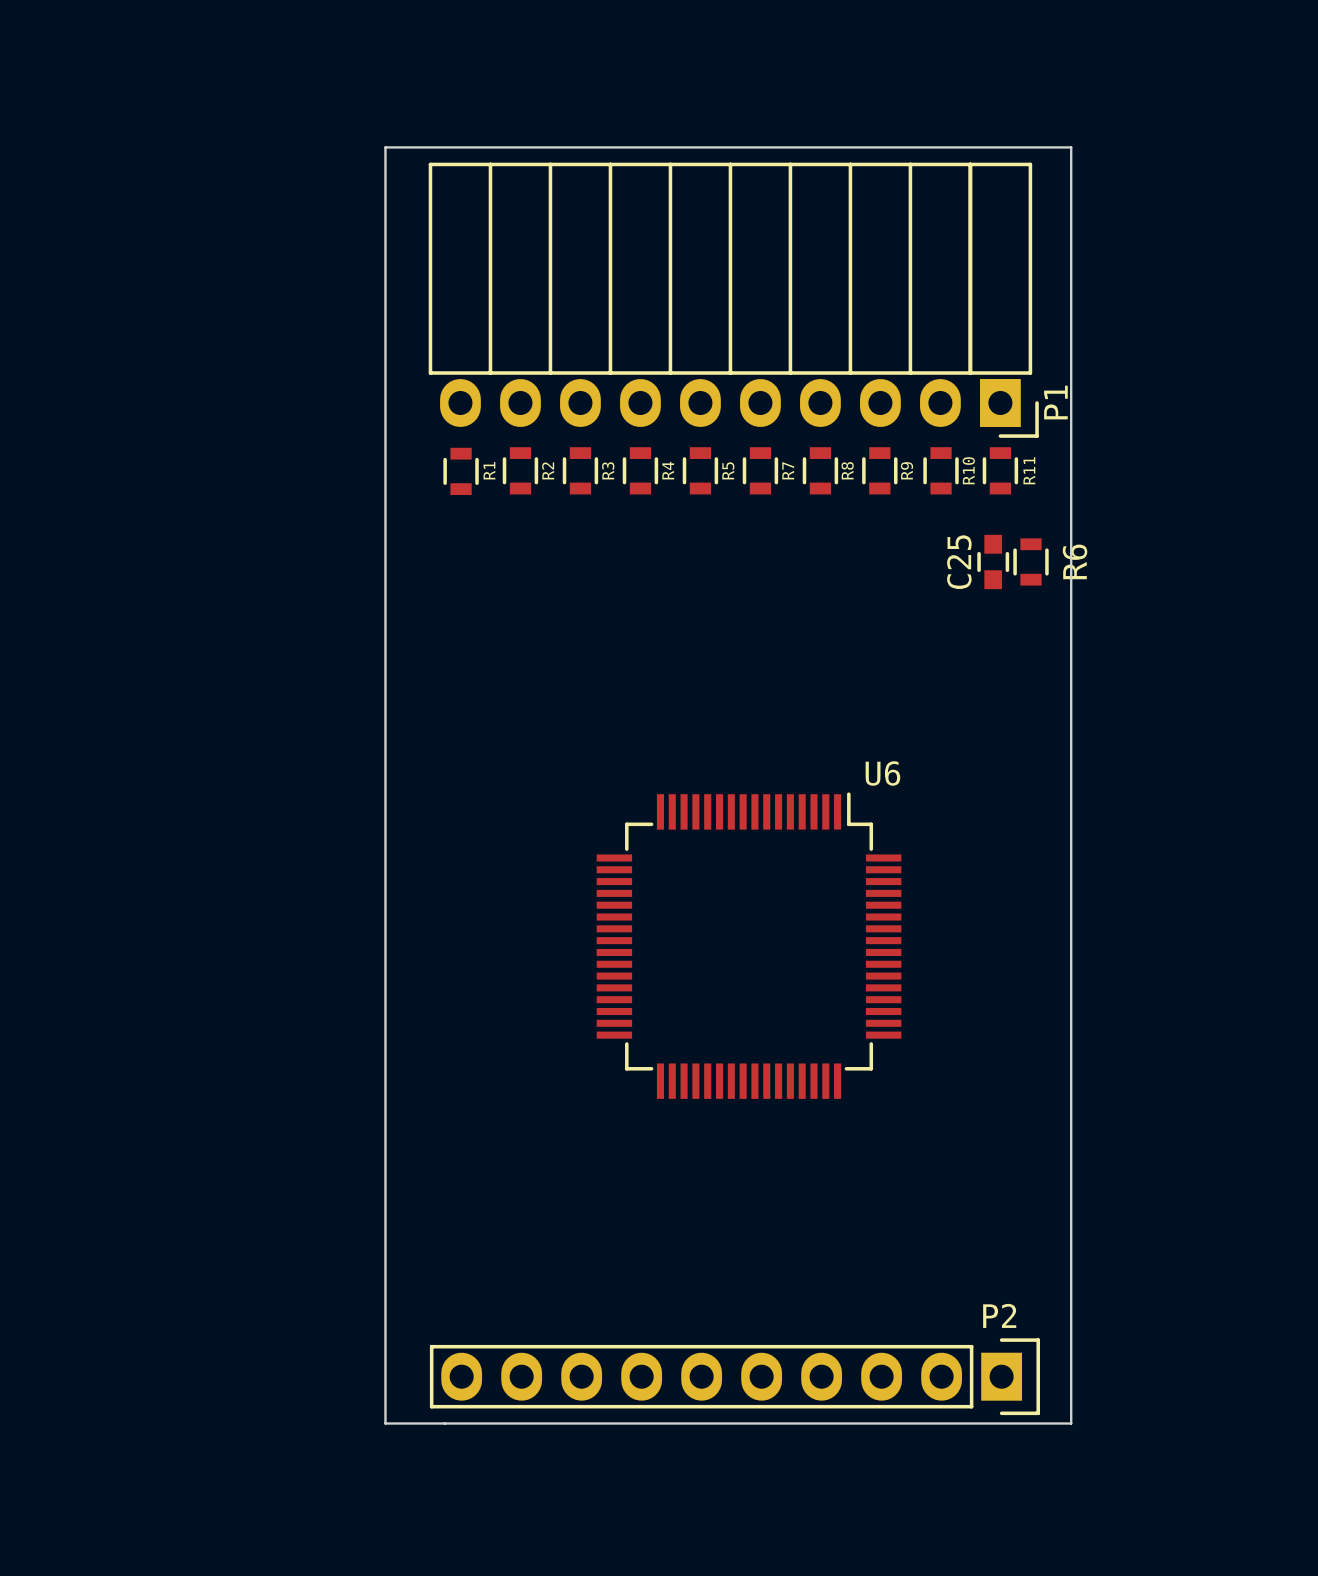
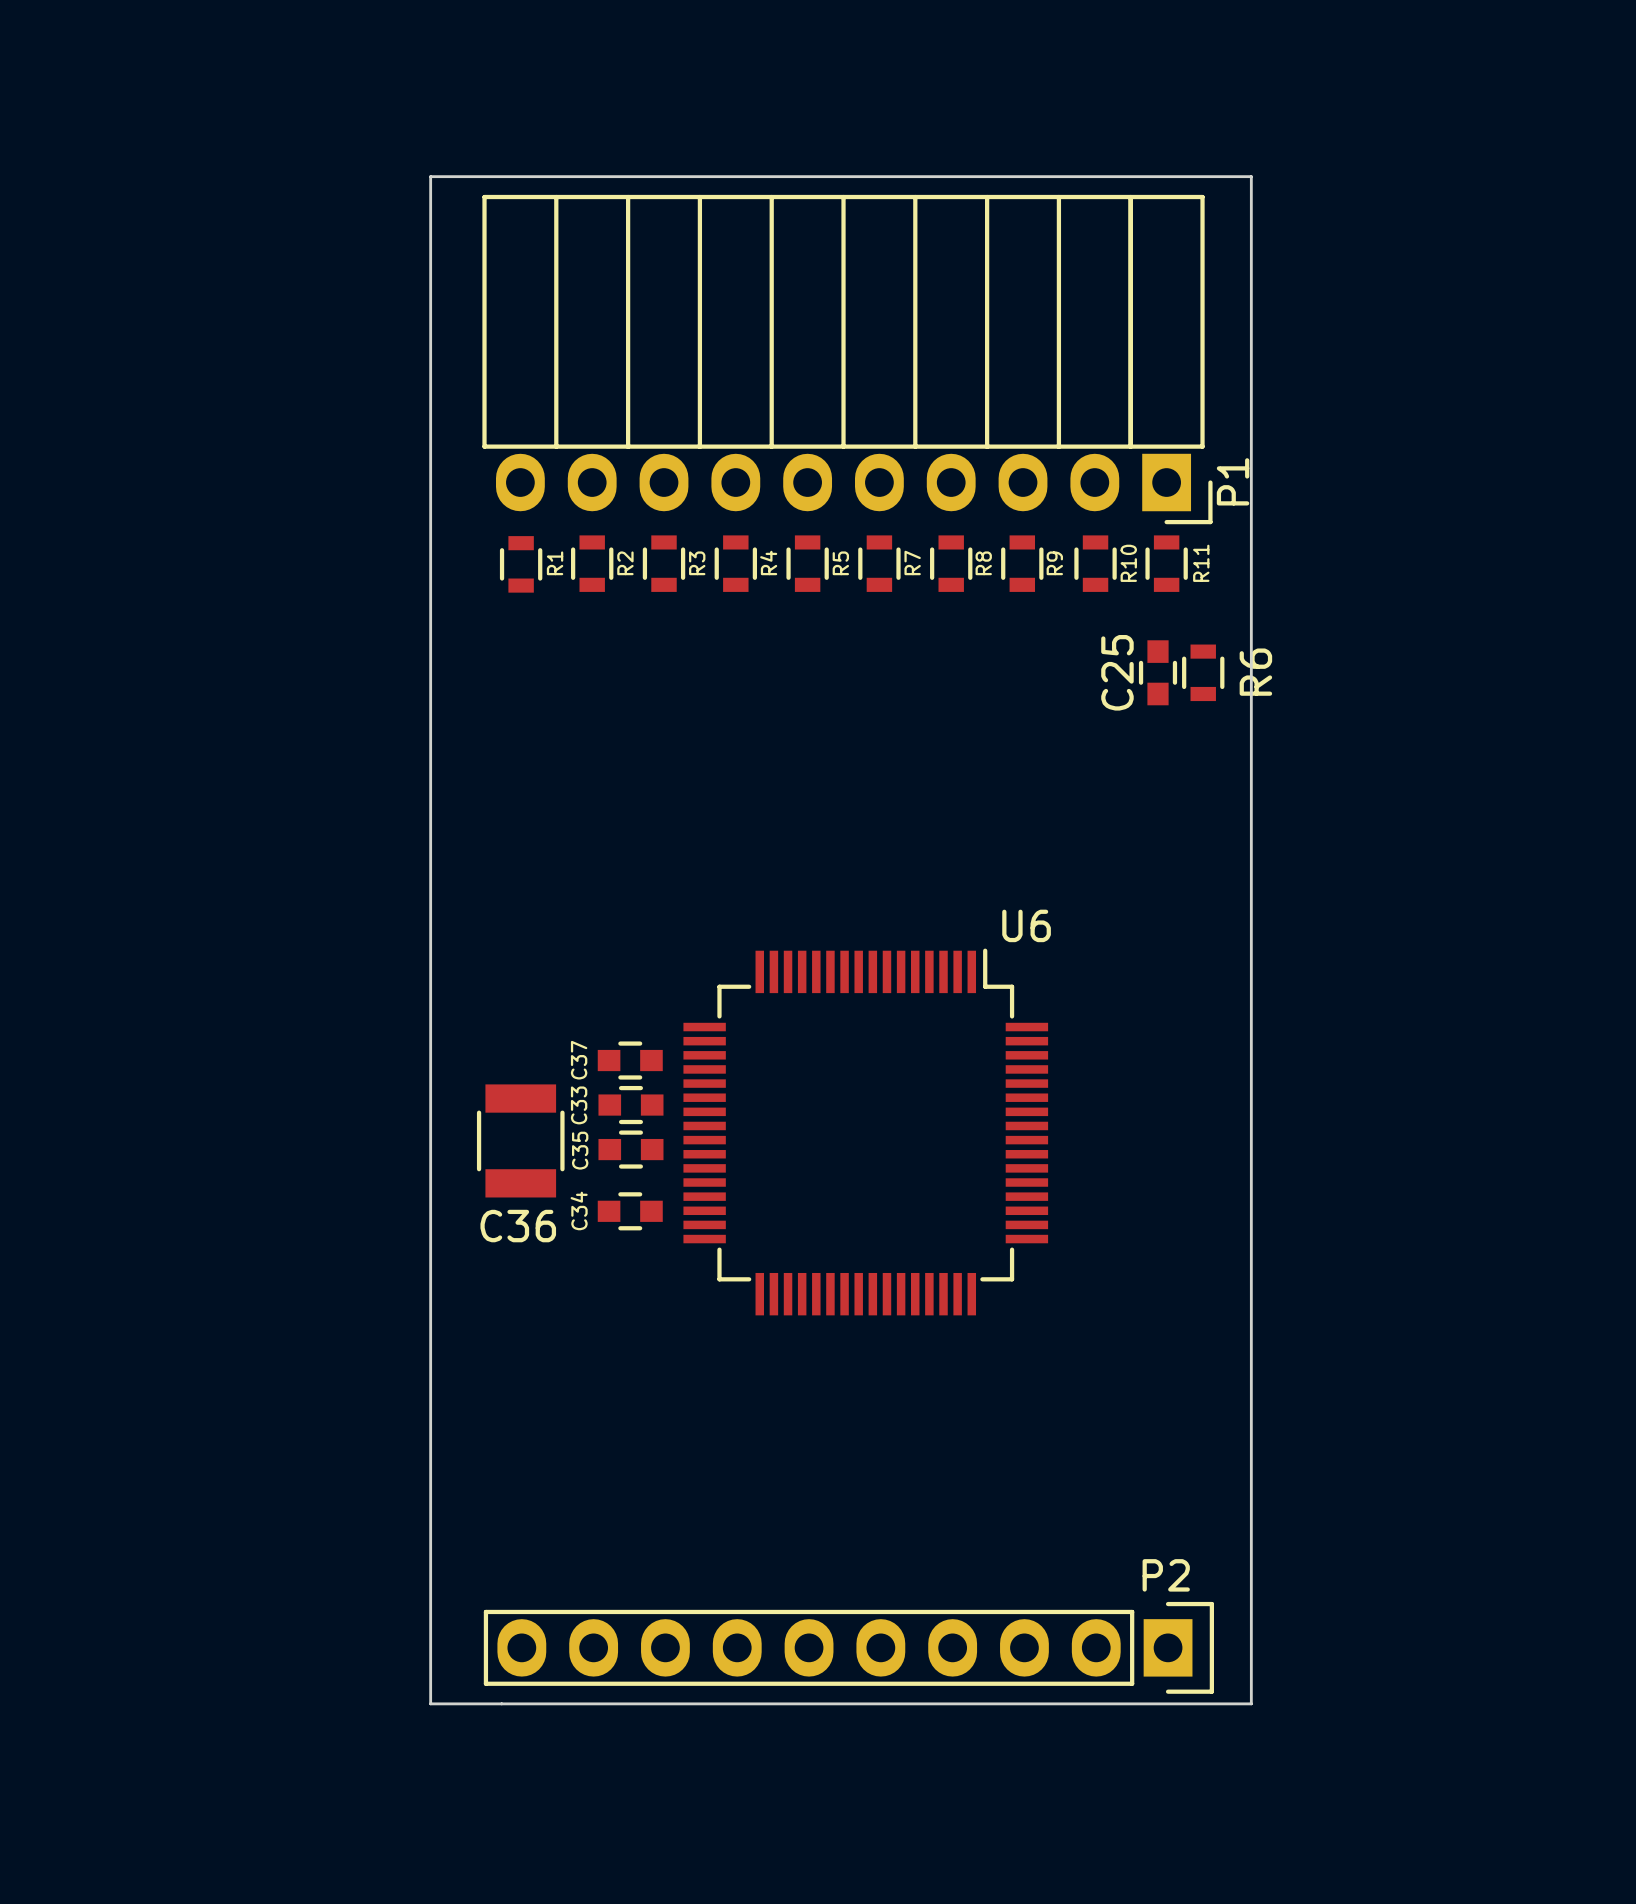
C37: none -> (630, 1060)
C33: none -> (630, 1105)
C36: none -> (520, 1140)
C35: none -> (630, 1149)
C34: none -> (630, 1211)

